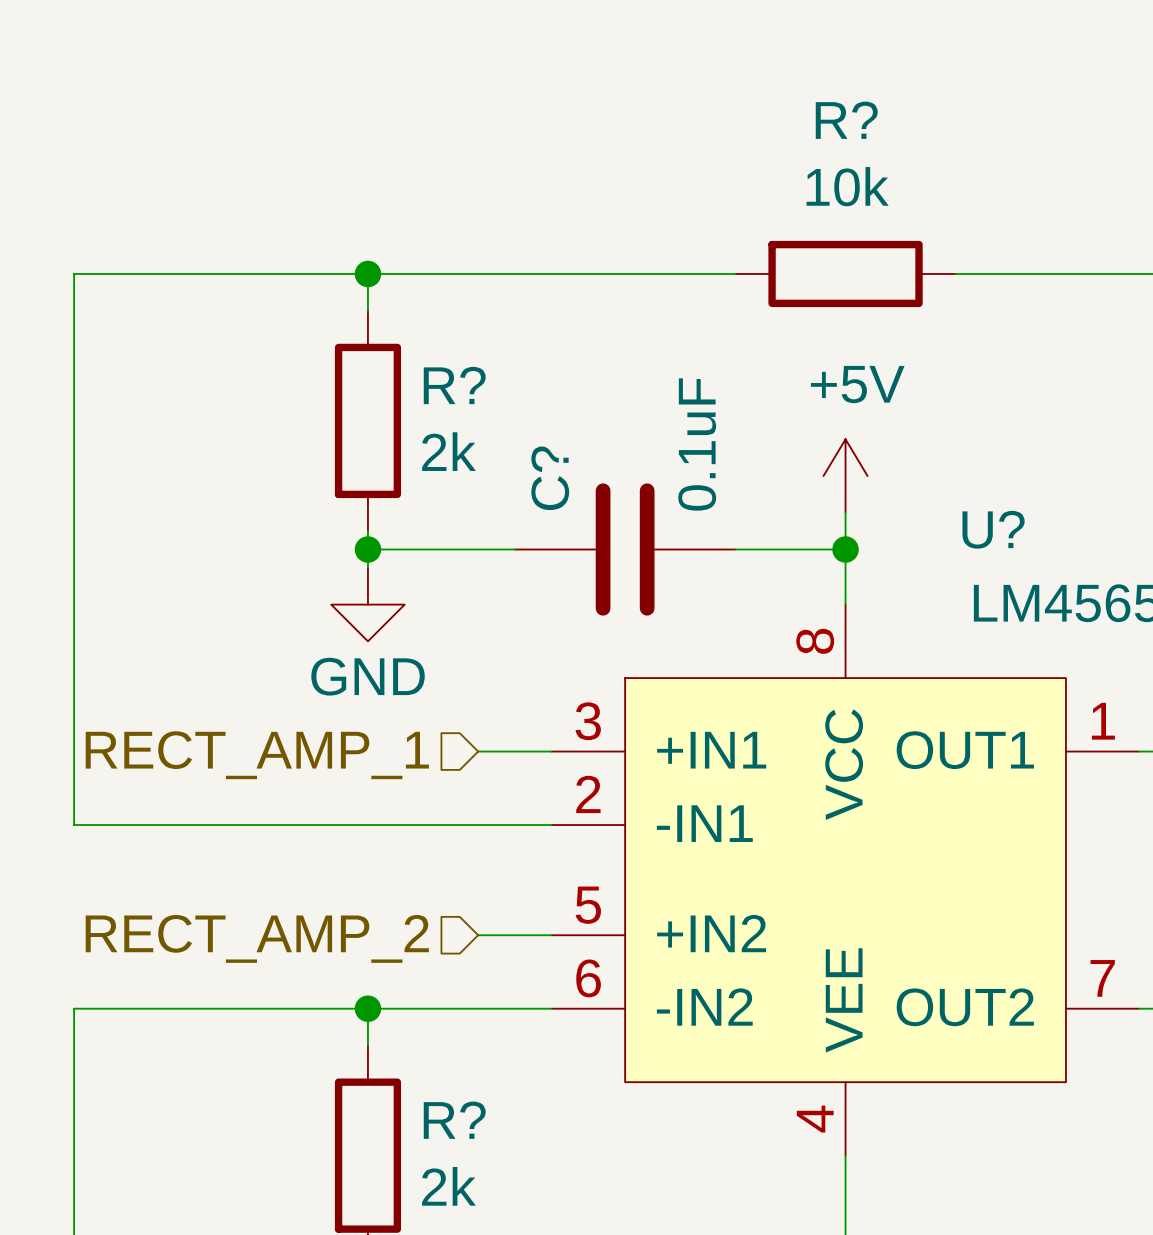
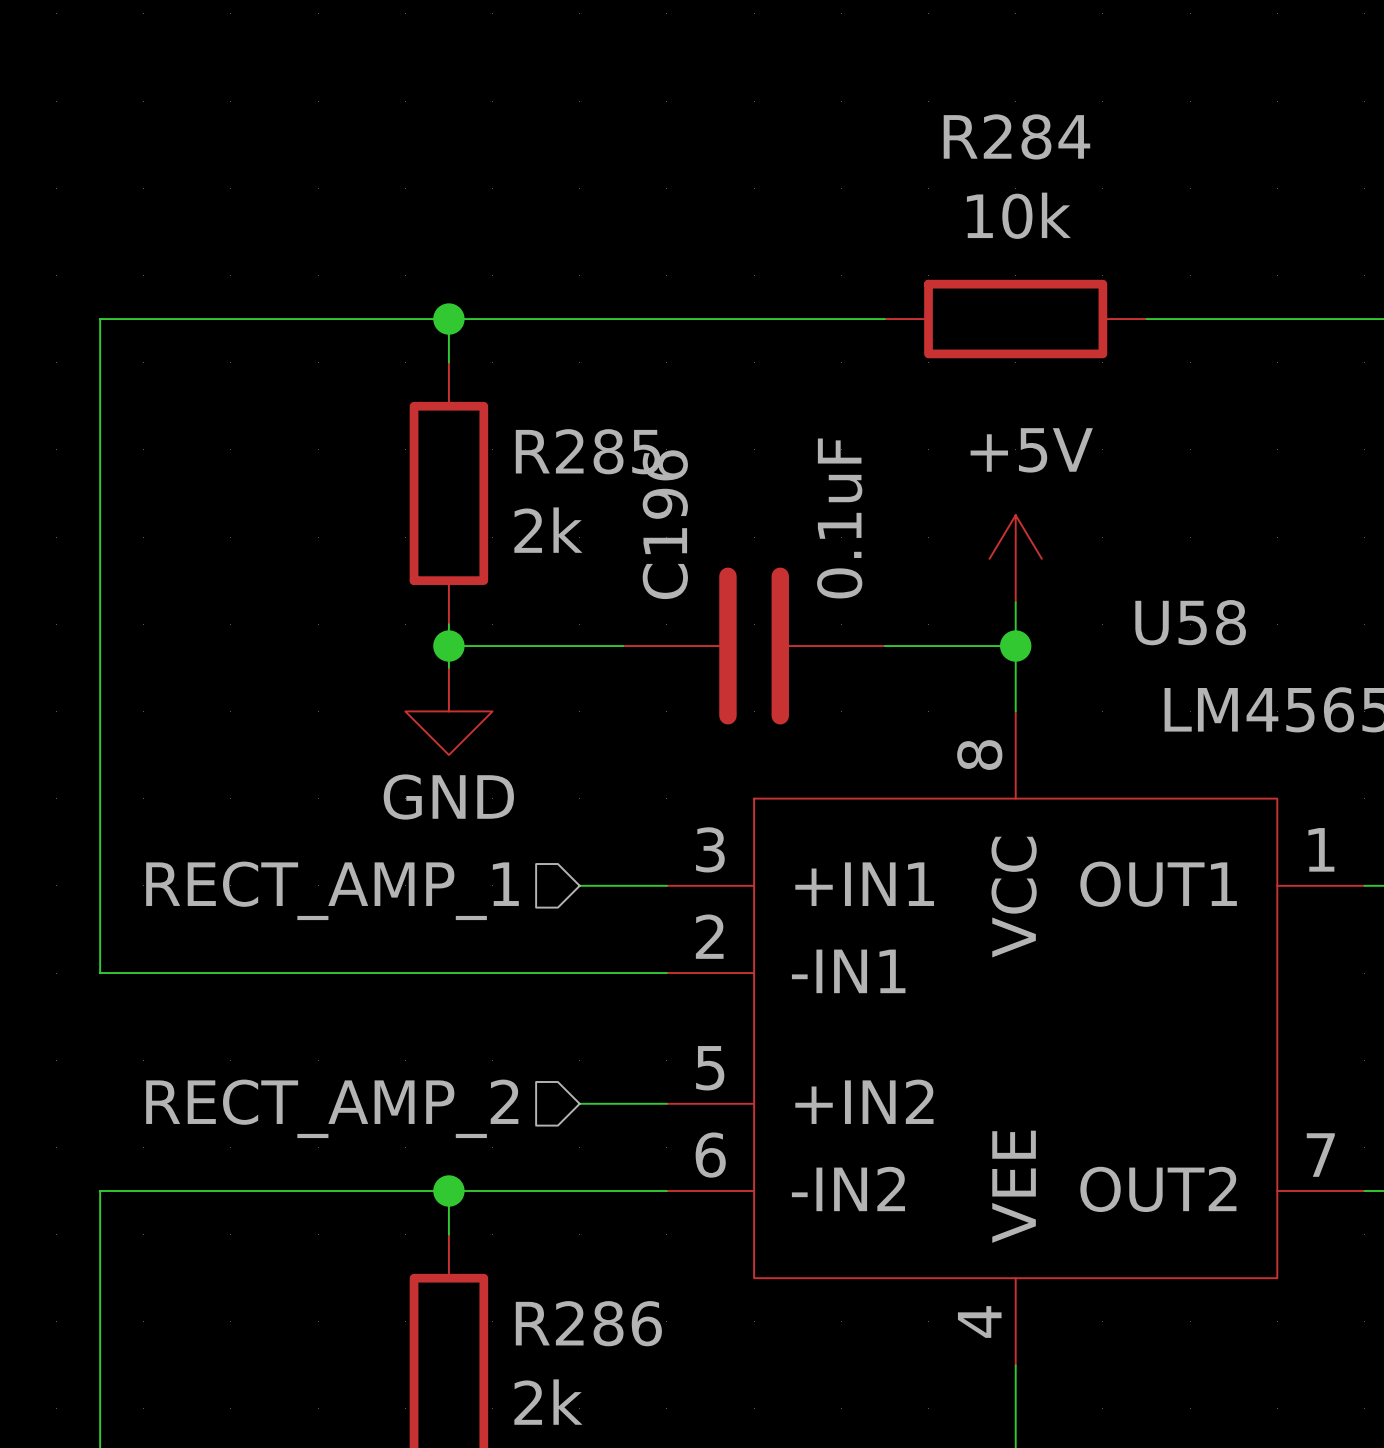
R? name: R? (846, 120) -> R284 (1016, 136)
R? name: R? (454, 385) -> R285 (588, 451)
C? name: C? (550, 478) -> C196 (665, 524)
U? name: U? (993, 529) -> U58 (1190, 622)
R? name: R? (454, 1120) -> R286 (588, 1323)

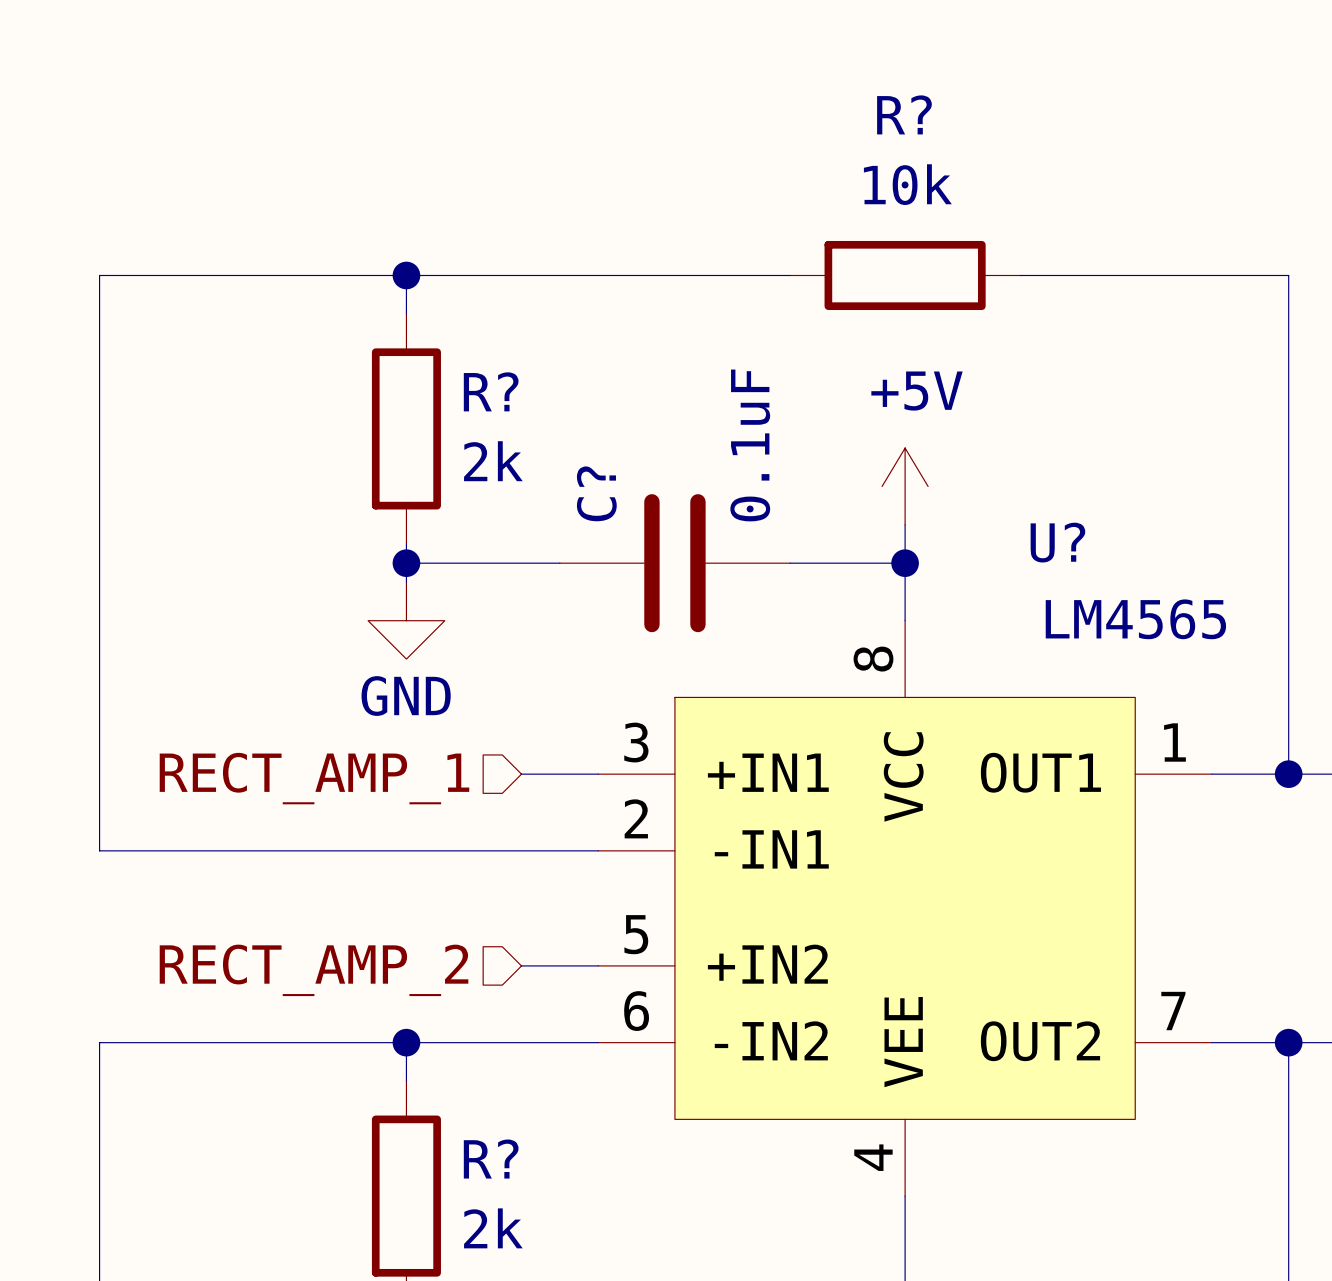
R284 name: R284 (1016, 136) -> R? (904, 114)
R285 name: R285 (588, 451) -> R? (491, 391)
C196 name: C196 (665, 524) -> C? (596, 493)
U58 name: U58 (1190, 622) -> U? (1057, 542)
R286 name: R286 (588, 1323) -> R? (491, 1159)

